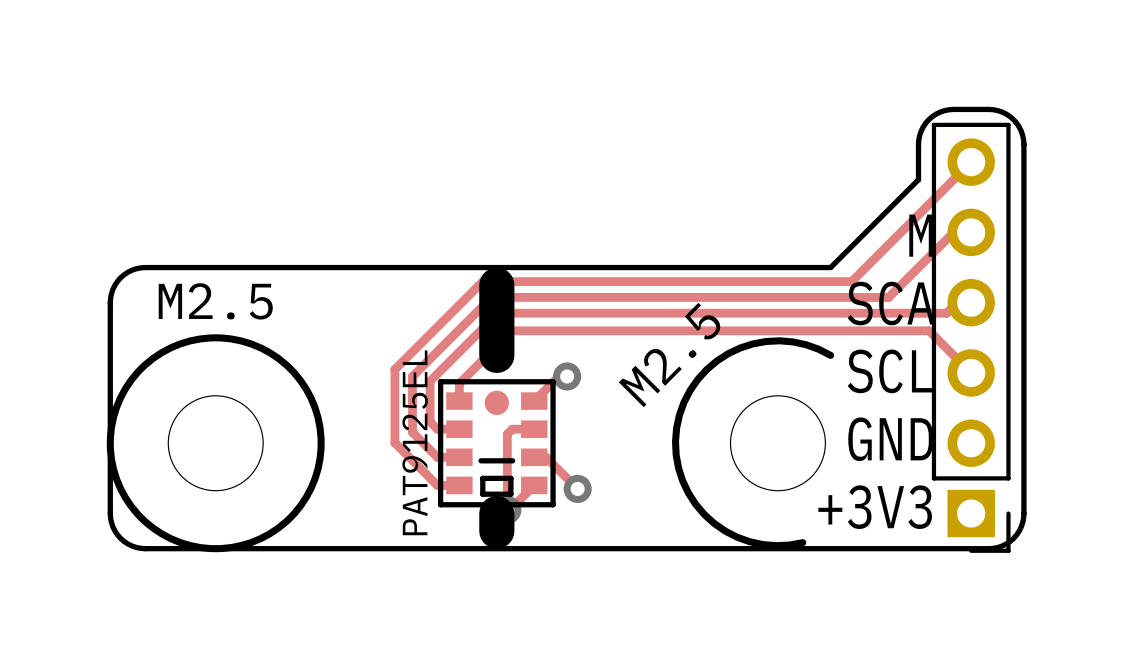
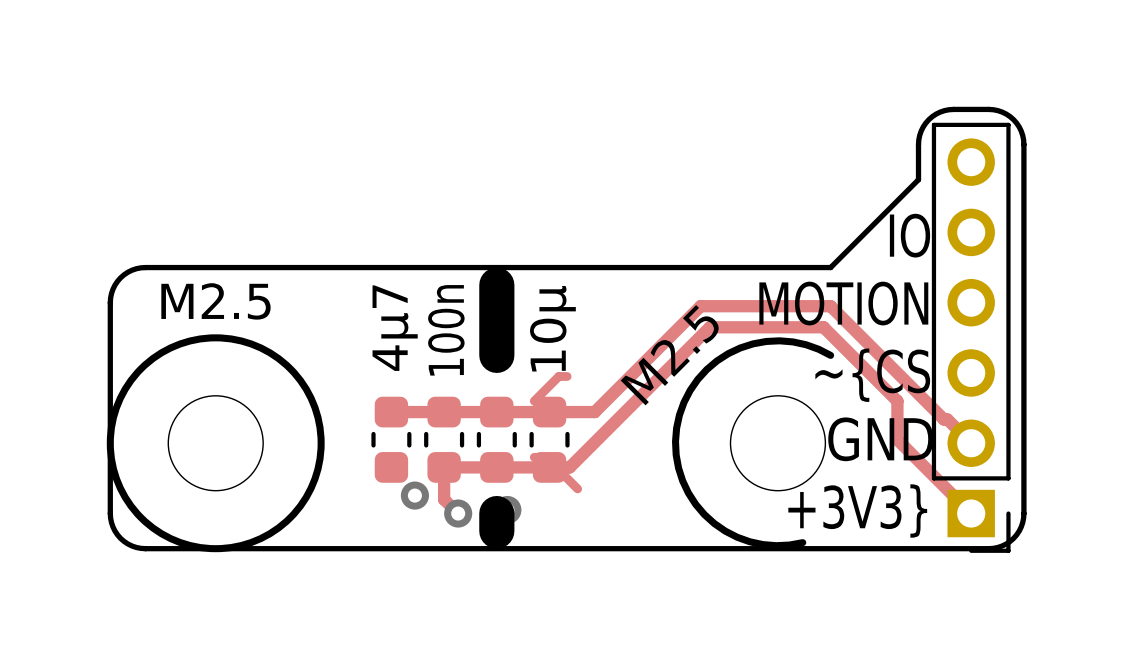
track: (971, 162) (851, 281) (482, 281) (394, 369) (394, 442) (437, 485) (459, 485) -> none
track: (971, 232) (953, 232) (888, 297) (491, 297) (412, 376) (412, 432) (437, 457) (459, 457) -> none
text: M (920, 235) -> IO (910, 235)
track: (971, 302) (957, 302) (946, 313) (498, 313) (430, 381) (430, 421) (437, 429) (459, 429) -> none
text: SCA (891, 303) -> MOTION (843, 303)
text: SCL (890, 371) -> ~{CS (872, 375)
track: (971, 372) (929, 330) (512, 330) (459, 383) (459, 401) -> none
via: (567, 376) -> none
part footprint: [437, 379, 556, 508] -> [476, 396, 517, 483]
track: none -> (391, 412) (594, 412) (700, 306) (830, 306) (943, 419) (947, 419) (971, 443)
track: (534, 429) (512, 429) (507, 434) (507, 510) (509, 510) (534, 485) -> none
part: none -> 4µ7 (391, 439)
part: none -> 100n (444, 439)
part: none -> 10µ (549, 439)
part value: PAT9125EL (415, 442) -> none
via: (577, 488) -> none
via: none -> (414, 495)
text: +3V3 (875, 507) -> +3V3} (857, 511)
track: none -> (458, 513) (444, 499) (444, 467) (569, 467) (709, 327) (823, 327) (897, 401) (897, 439) (971, 513)
via: none -> (458, 513)

